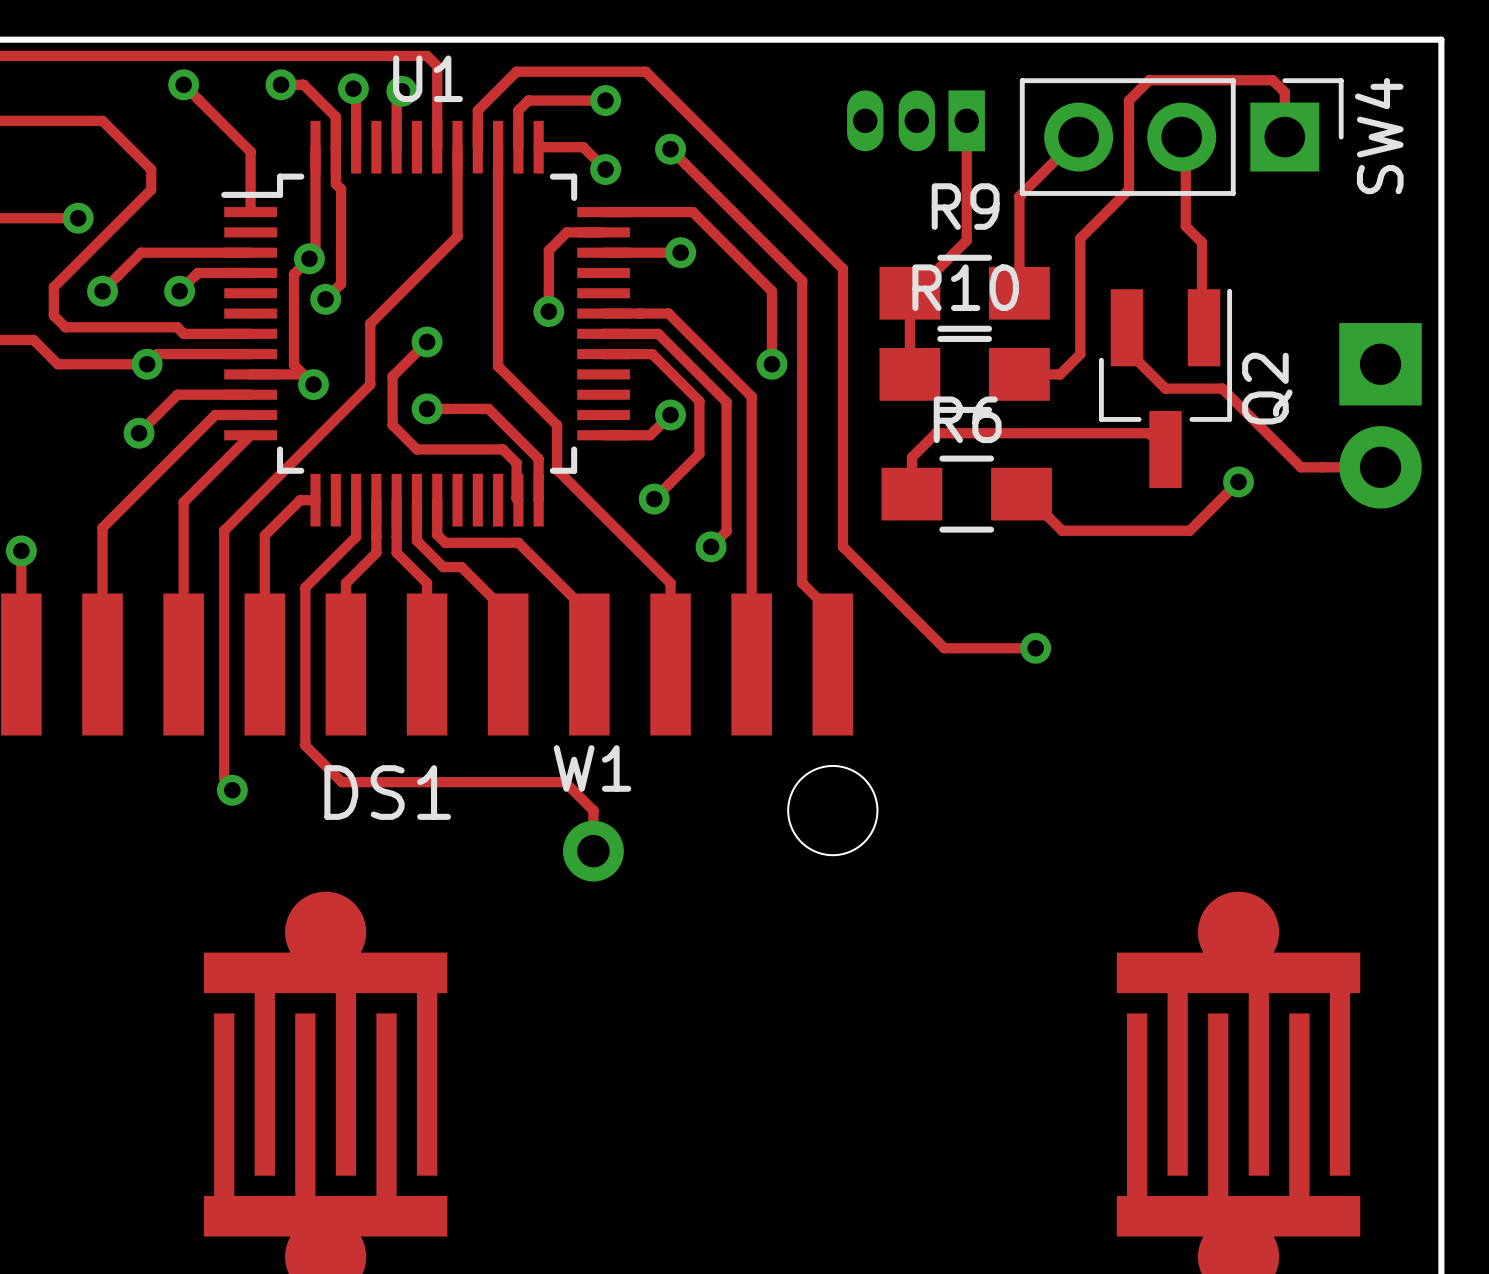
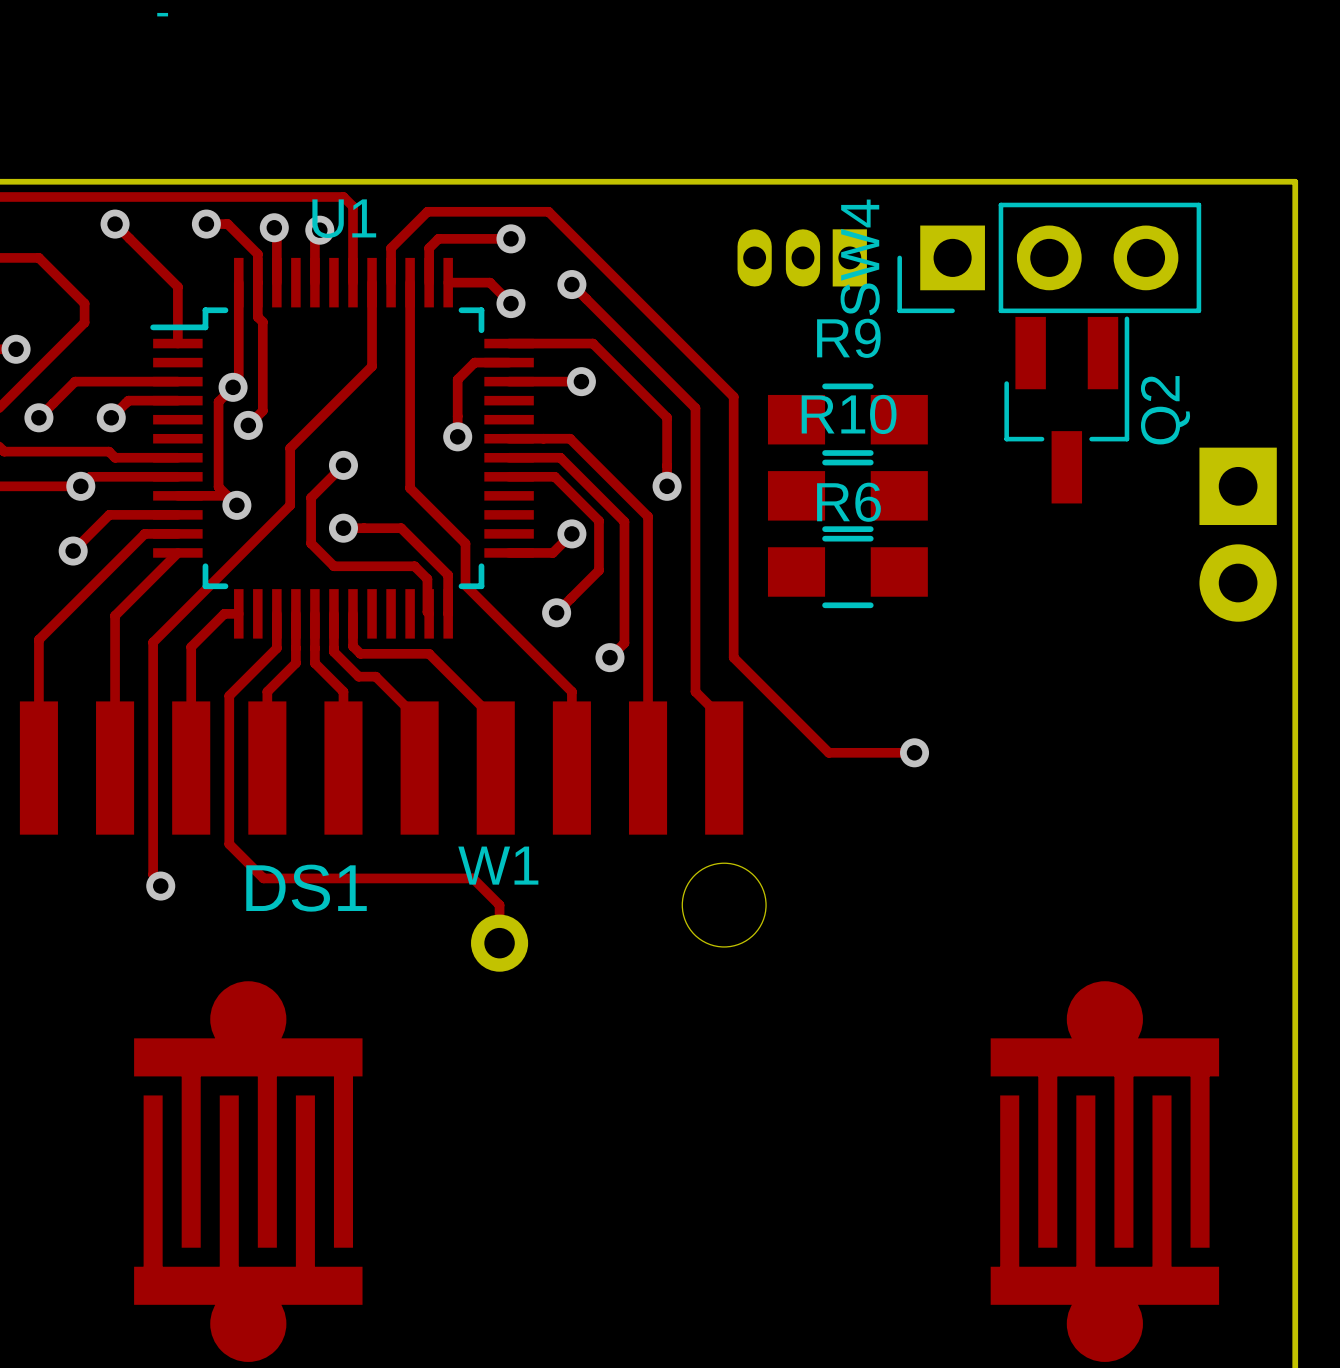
track: (966, 120) (966, 240) (913, 293) (909, 293) (909, 374) -> none
track: (1078, 137) (1019, 196) (1019, 293) -> none
track: (1181, 137) (1185, 141) (1185, 226) (1202, 242) (1202, 325) (1204, 327) -> none
SW4 rotation: 0° (1181, 137) -> 180° (1049, 257)
track: (1284, 137) (1284, 92) (1272, 80) (1149, 80) (1128, 100) (1128, 189) (1080, 238) (1080, 354) (1060, 374) (1019, 374) -> none
track: (1126, 327) (1126, 350) (1165, 388) (1222, 388) (1301, 467) (1380, 467) -> none
Q2 position: (1165, 388) -> (1066, 409)
track: (1165, 449) (1149, 433) (936, 433) (911, 457) (911, 494) -> none
track: (1238, 481) (1189, 530) (1062, 530) (1025, 494) (1021, 494) -> none
via: (1238, 481) -> none
R6 position: (966, 494) -> (847, 571)

